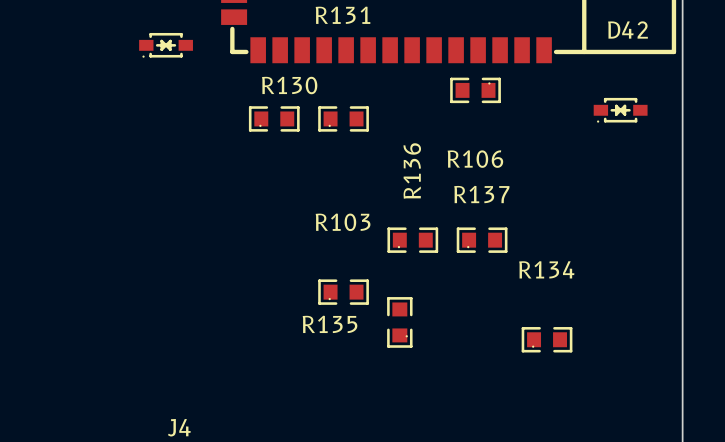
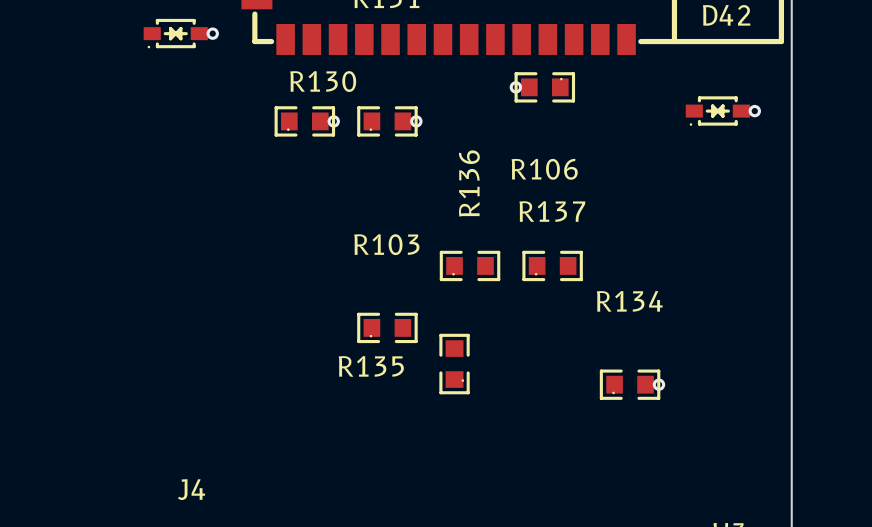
via: none -> (212, 33)
via: none -> (515, 87)
via: none -> (754, 111)
via: none -> (333, 121)
via: none -> (416, 121)
via: none -> (658, 384)

